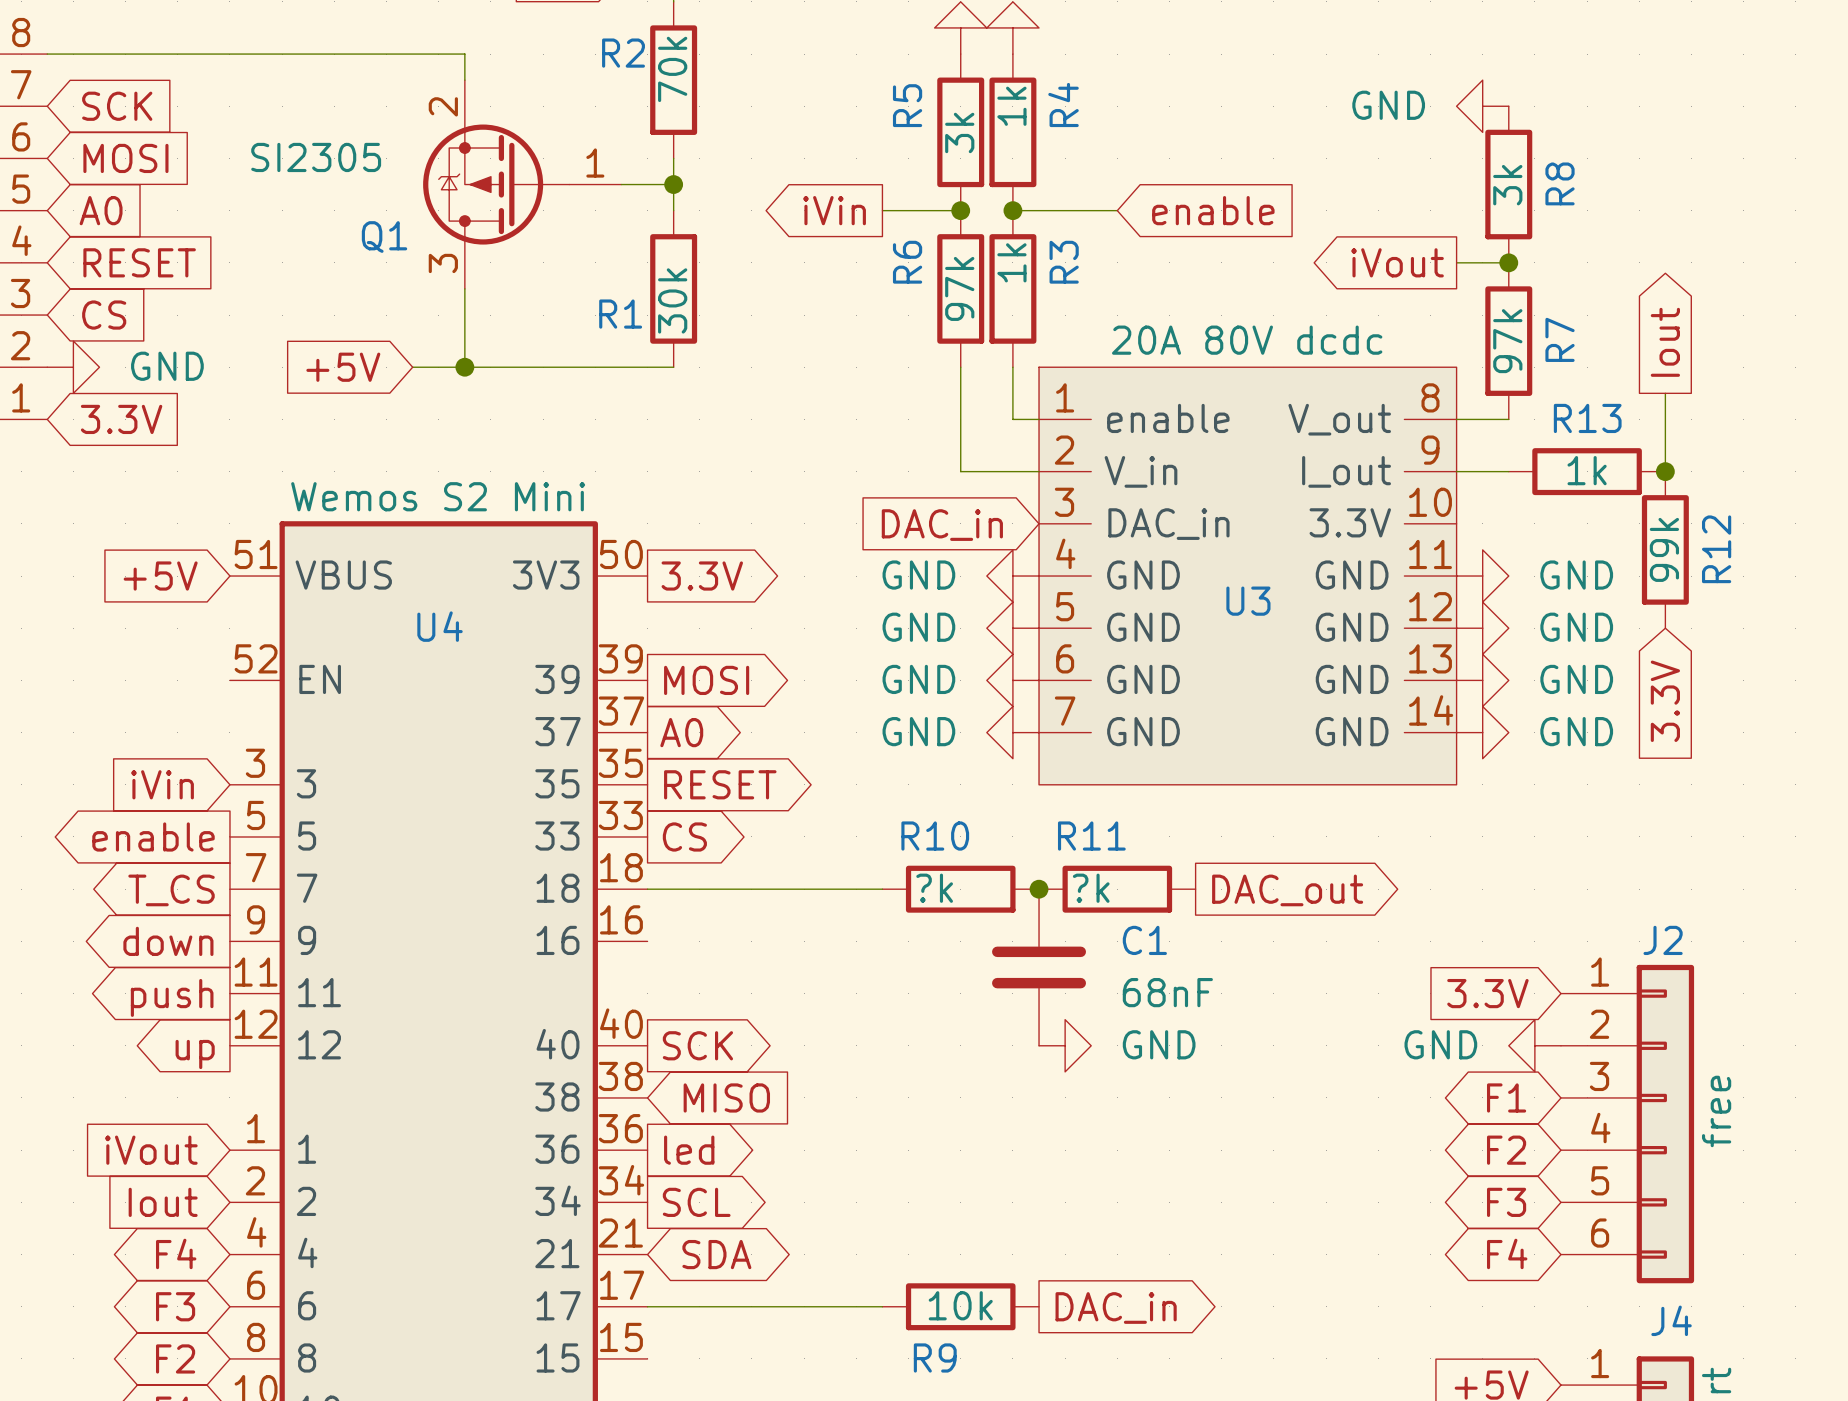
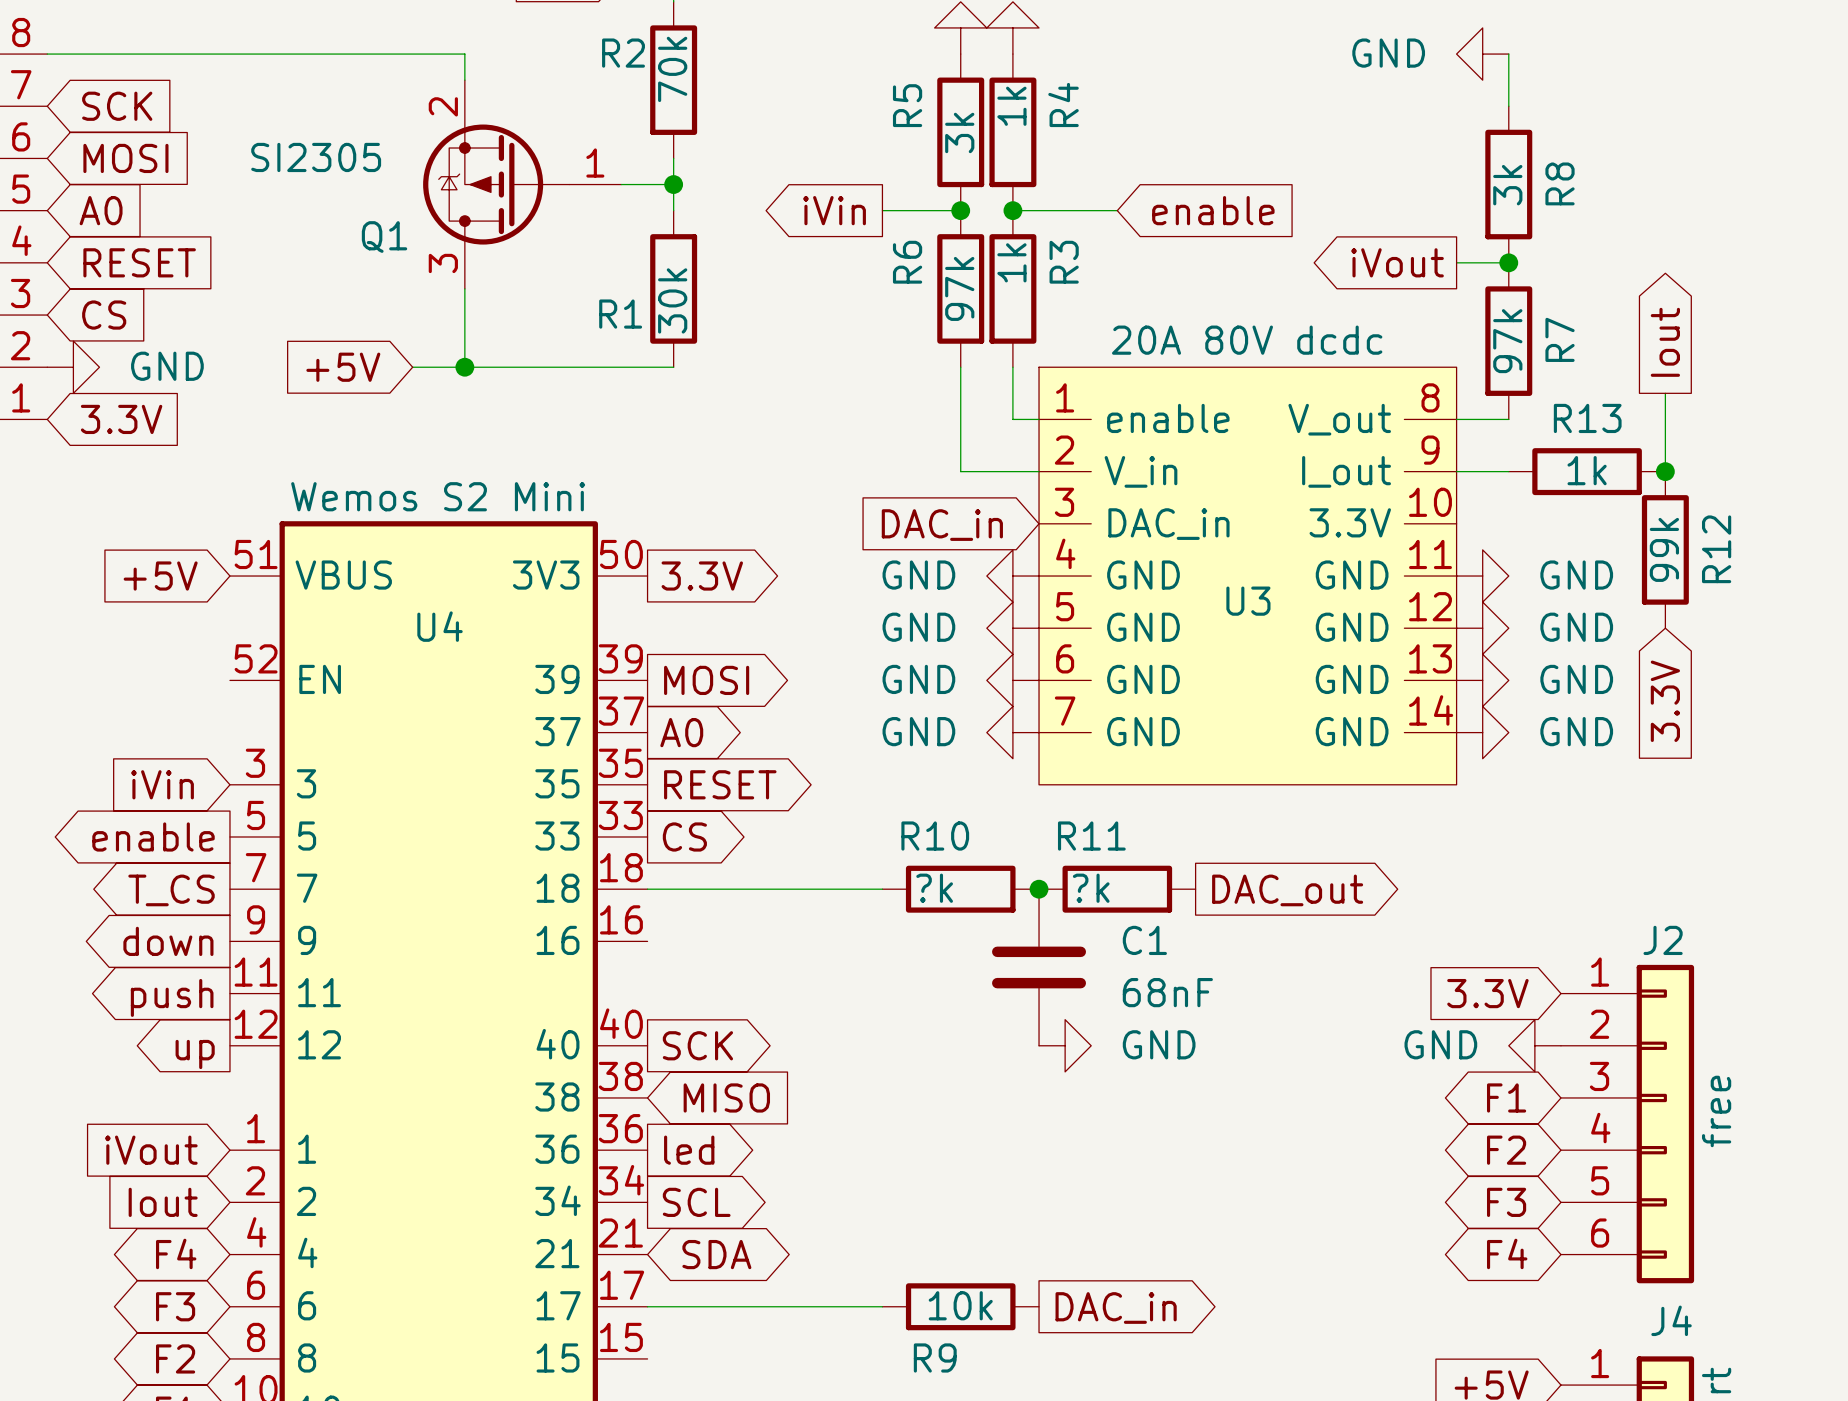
wire: none -> (1508, 54) (1508, 106)
power symbol position: GND (1482, 106) -> GND (1482, 54)

